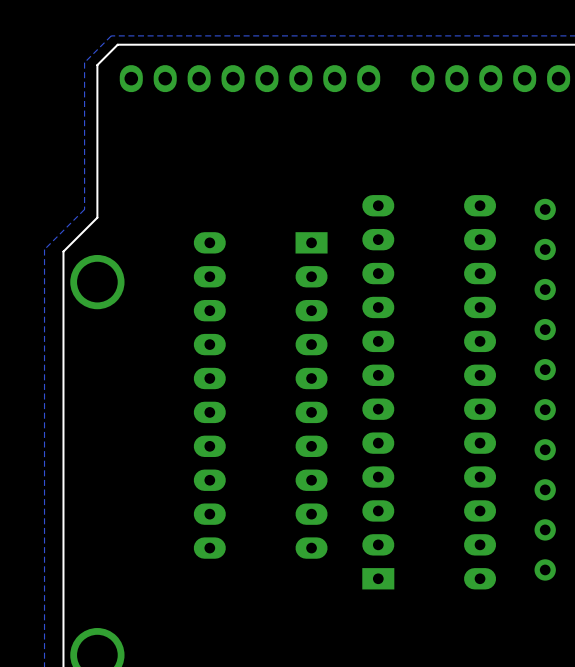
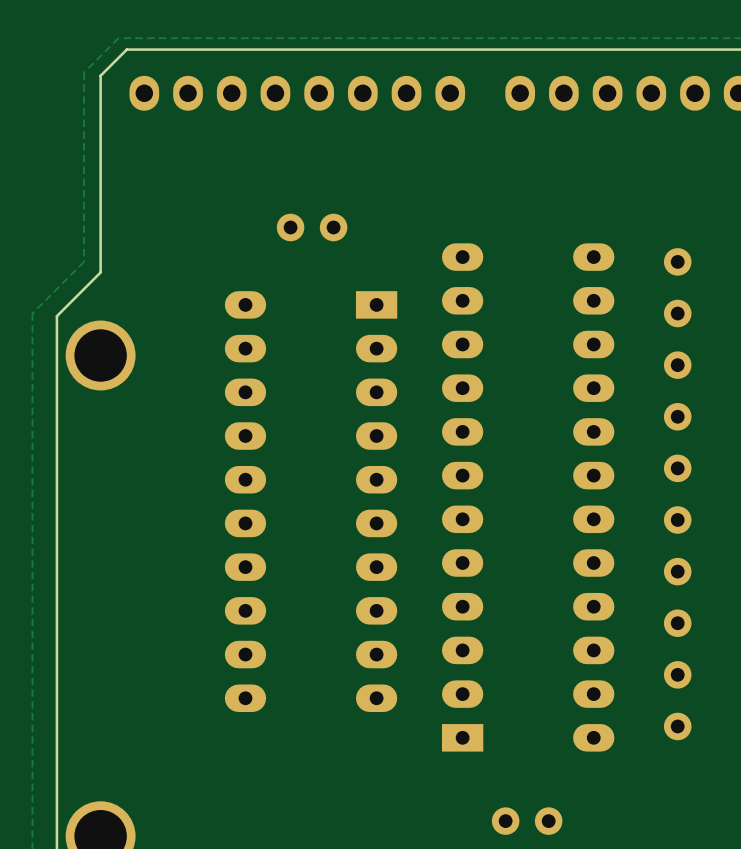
part: none -> (312, 227)
part: none -> (527, 821)

